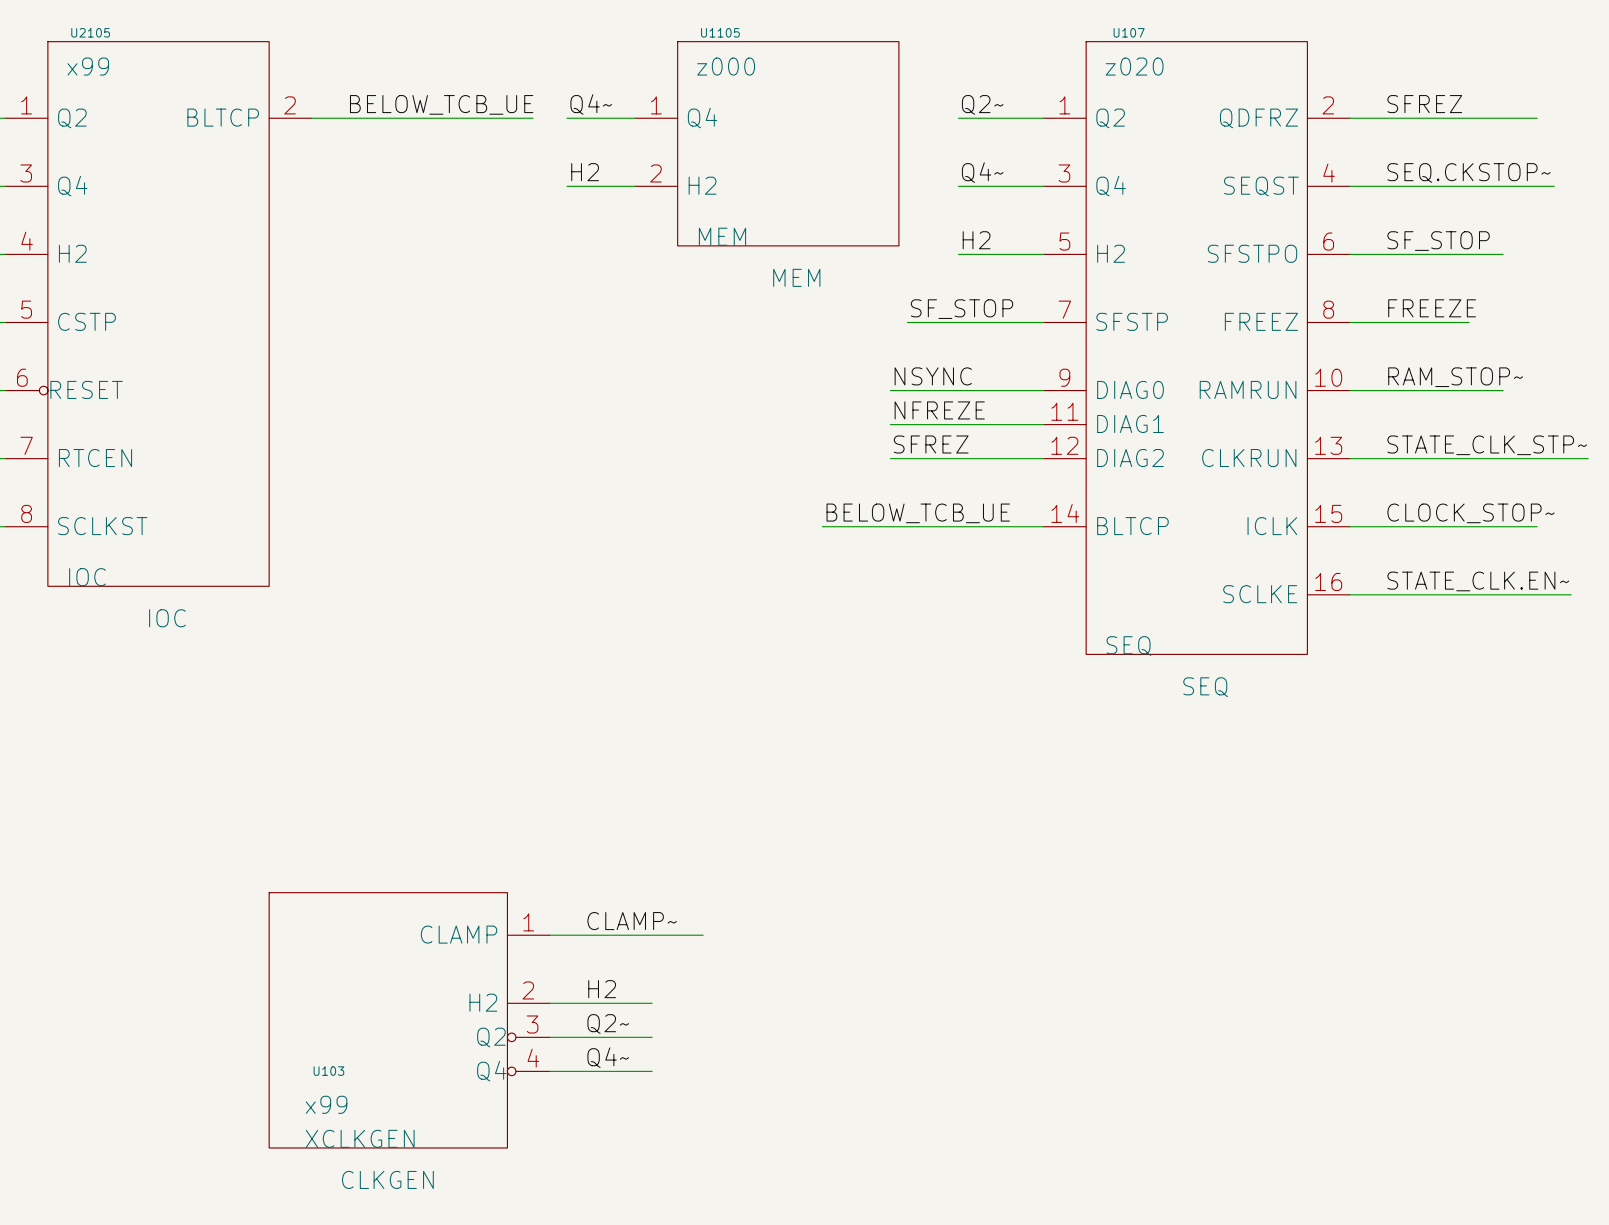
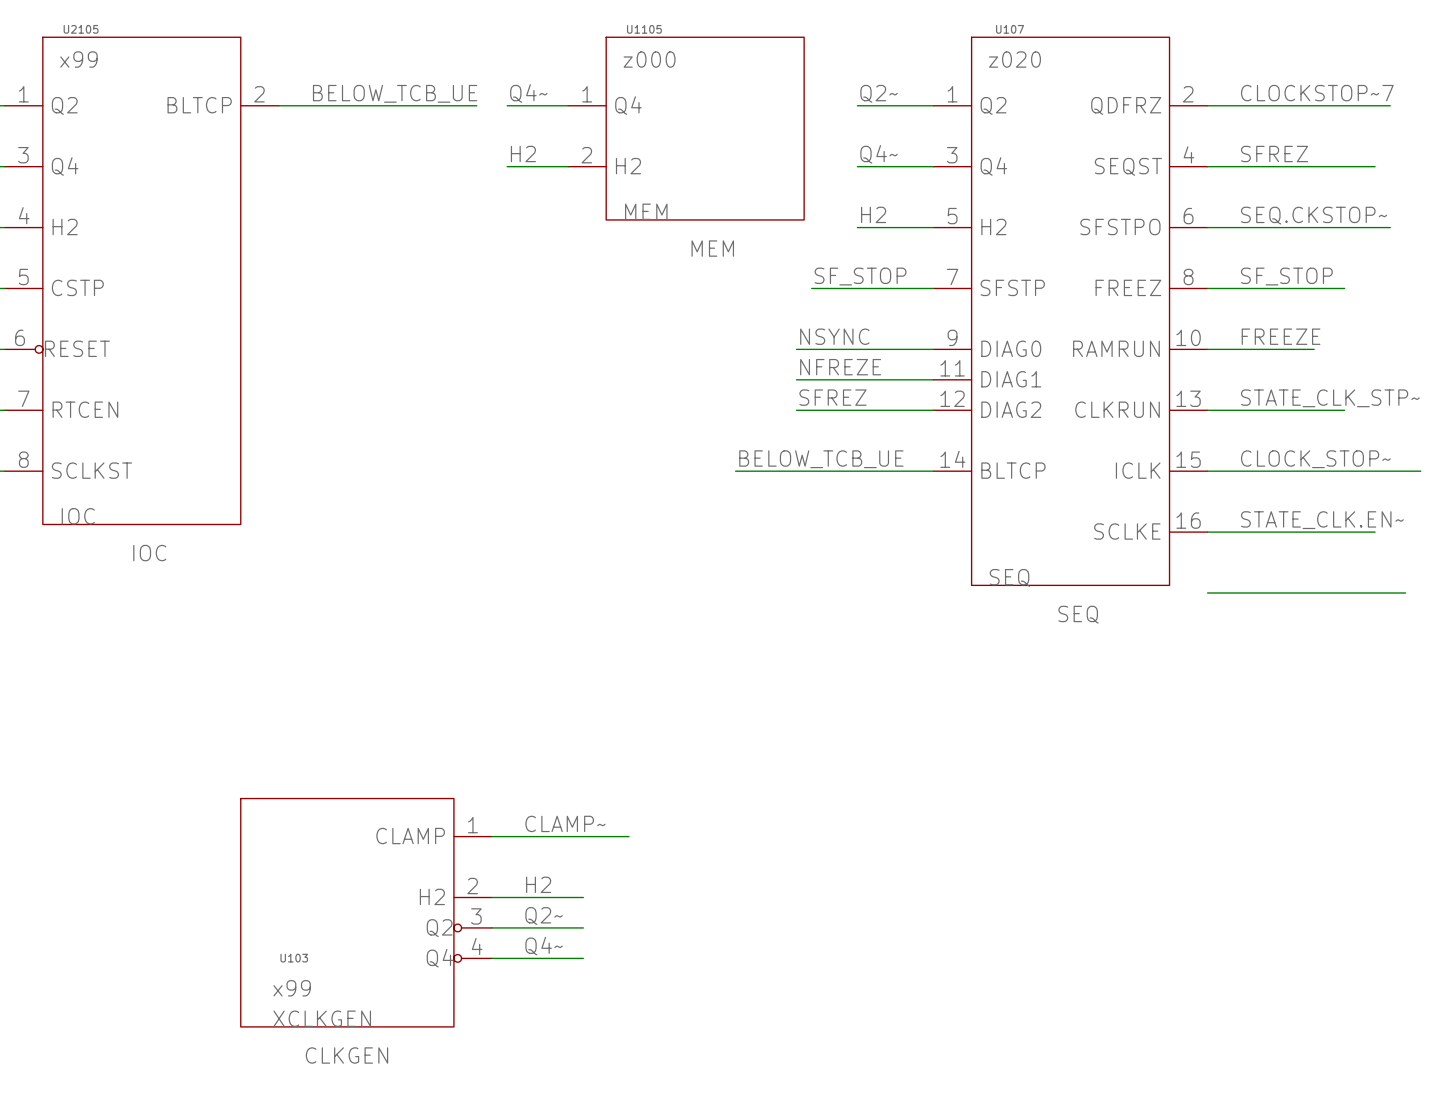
label: SFREZ (1424, 104) -> CLOCKSTOP~7 (1317, 93)
label: SEQ.CKSTOP~ (1468, 172) -> SFREZ (1274, 154)
wire: (1537, 186) (1554, 186) -> (1375, 105) (1390, 105)
label: SF_STOP (1438, 241) -> SEQ.CKSTOP~ (1314, 215)
wire: none -> (1344, 227) (1390, 227)
label: FREEZE (1432, 308) -> SF_STOP (1286, 276)
label: RAM_STOP~ (1455, 377) -> FREEZE (1281, 336)
wire: (1469, 390) (1503, 390) -> (1314, 288) (1344, 288)
wire: (1503, 458) (1588, 458) -> none
wire: none -> (1375, 471) (1420, 471)
wire: (1537, 594) (1571, 594) -> none
wire: none -> (1207, 592) (1405, 592)

